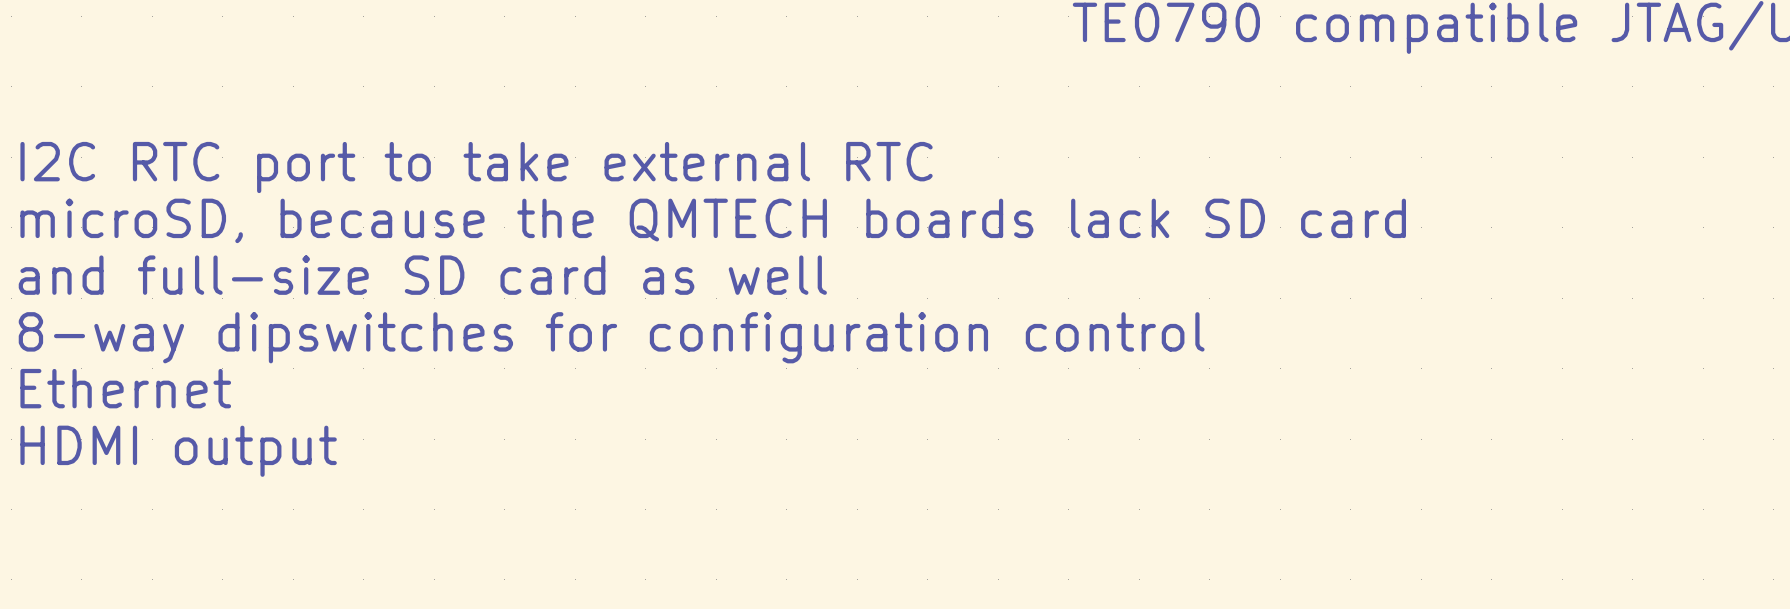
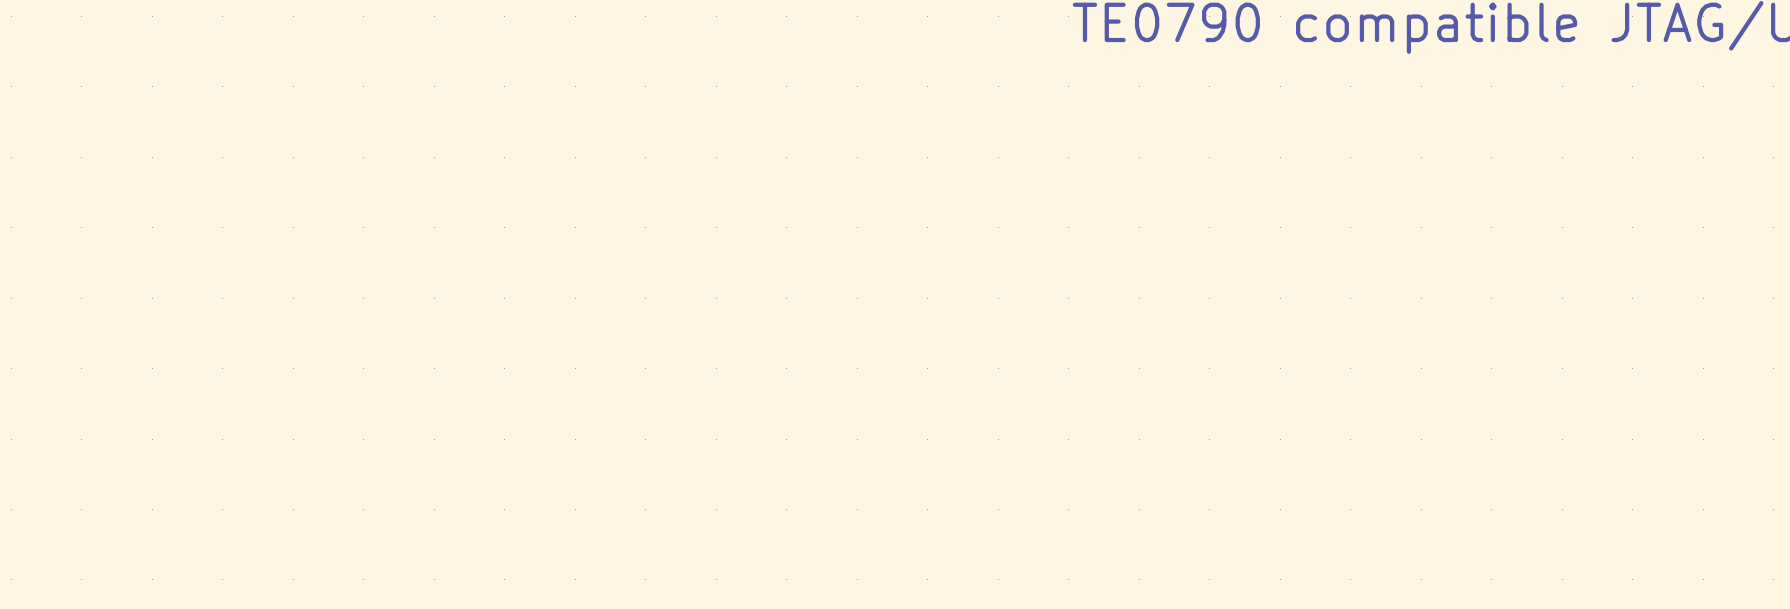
text: I2C RTC port to take external RTC (476, 167) -> none
text: microSD, because the QMTECH boards lack SD card (713, 220) -> none
text: and full-size SD card as well (422, 275) -> none
text: 8-way dipswitches for configuration control (611, 337) -> none
text: Ethernet (125, 388) -> none
text: HDMI output (178, 451) -> none

